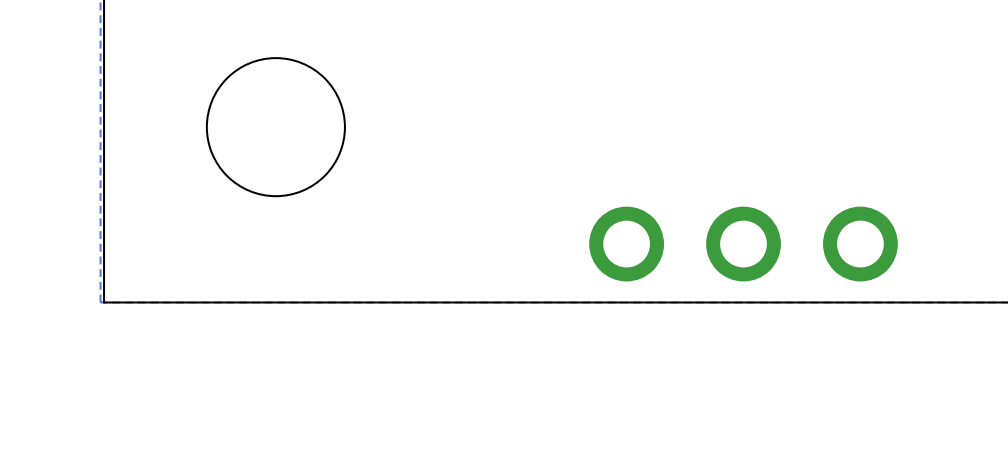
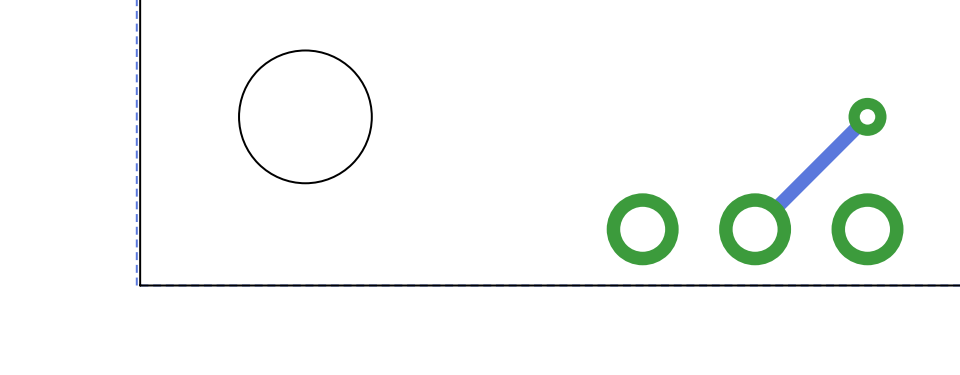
track: none -> (867, 116) (755, 229)
via: none -> (867, 116)

